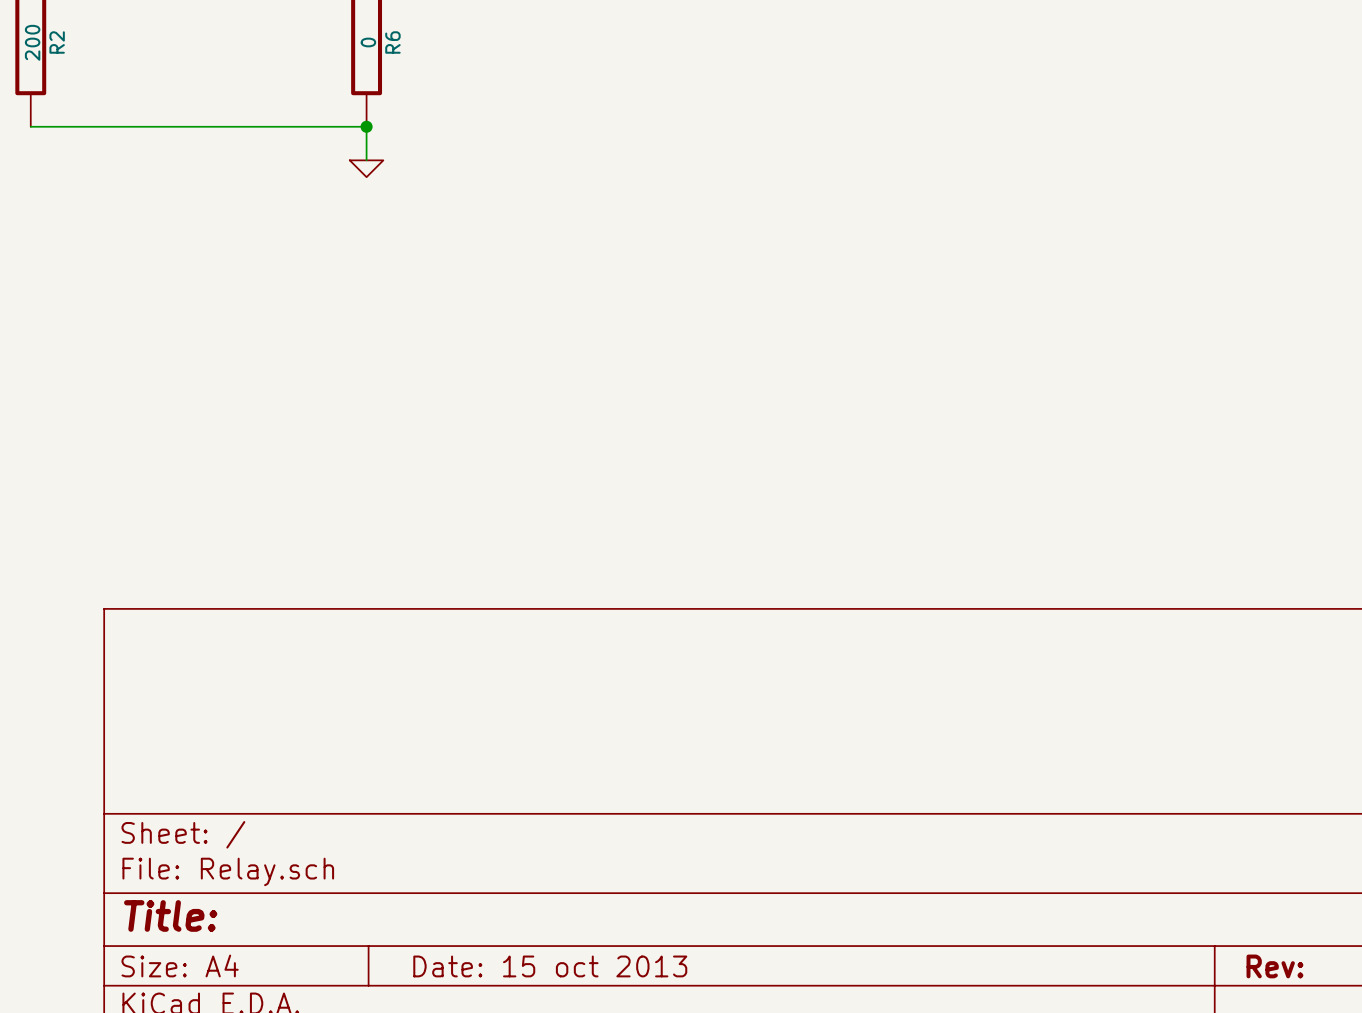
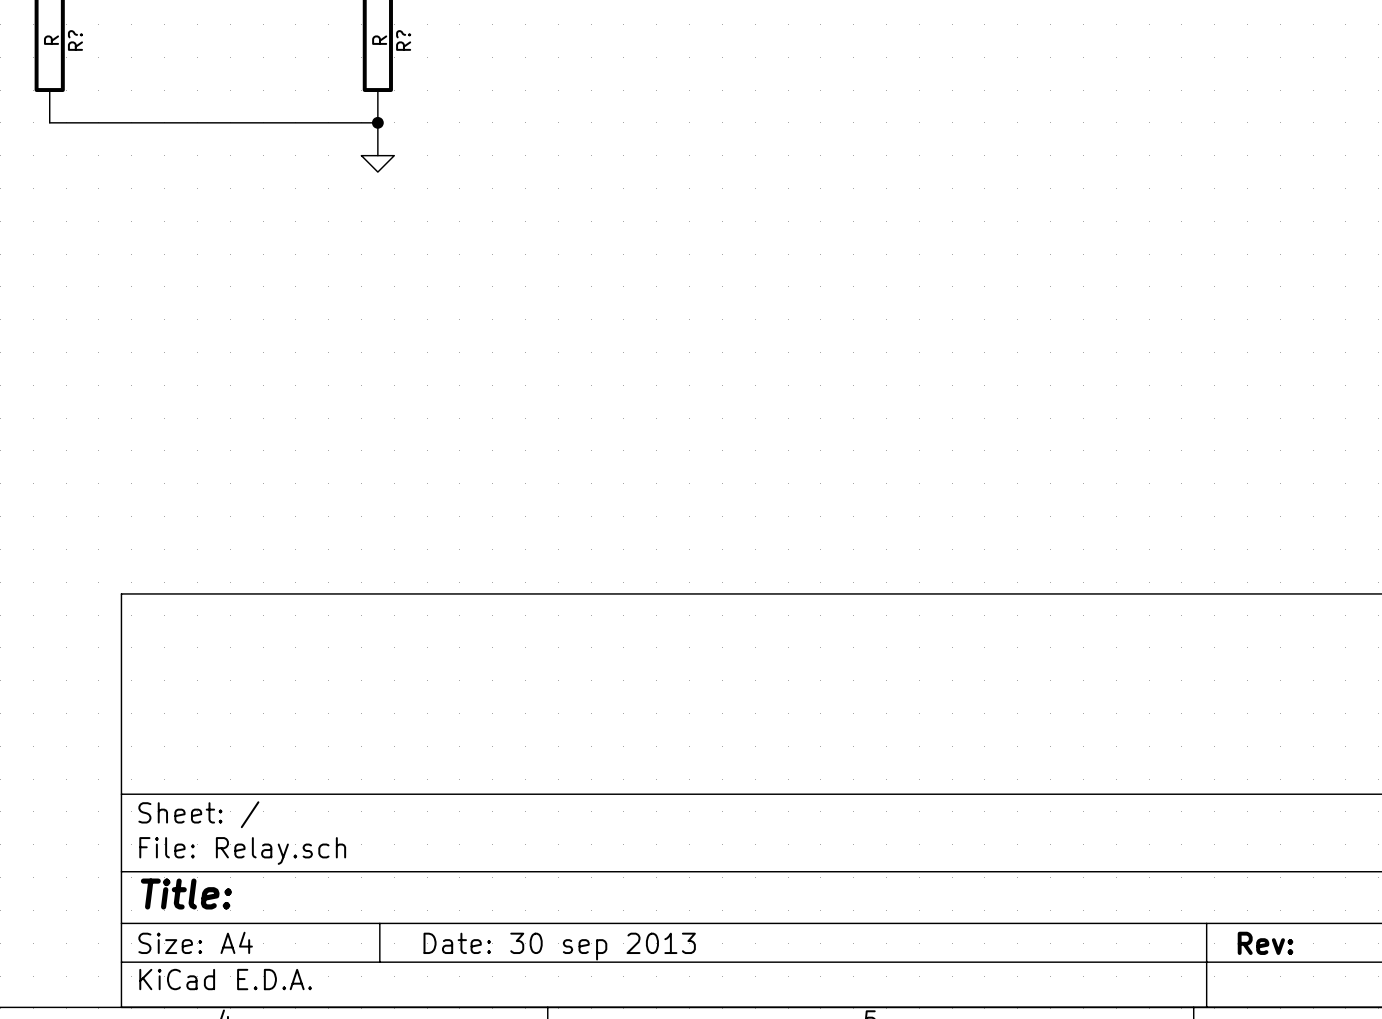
R2 value: 200 (32, 42) -> R (51, 40)
R2 name: R2 (57, 42) -> R? (75, 40)
R6 value: 0 (368, 42) -> R (379, 40)
R6 name: R6 (392, 42) -> R? (403, 40)
title block: Date: 15 oct 2013 (550, 966) -> Date: 30 sep 2013 (559, 946)

